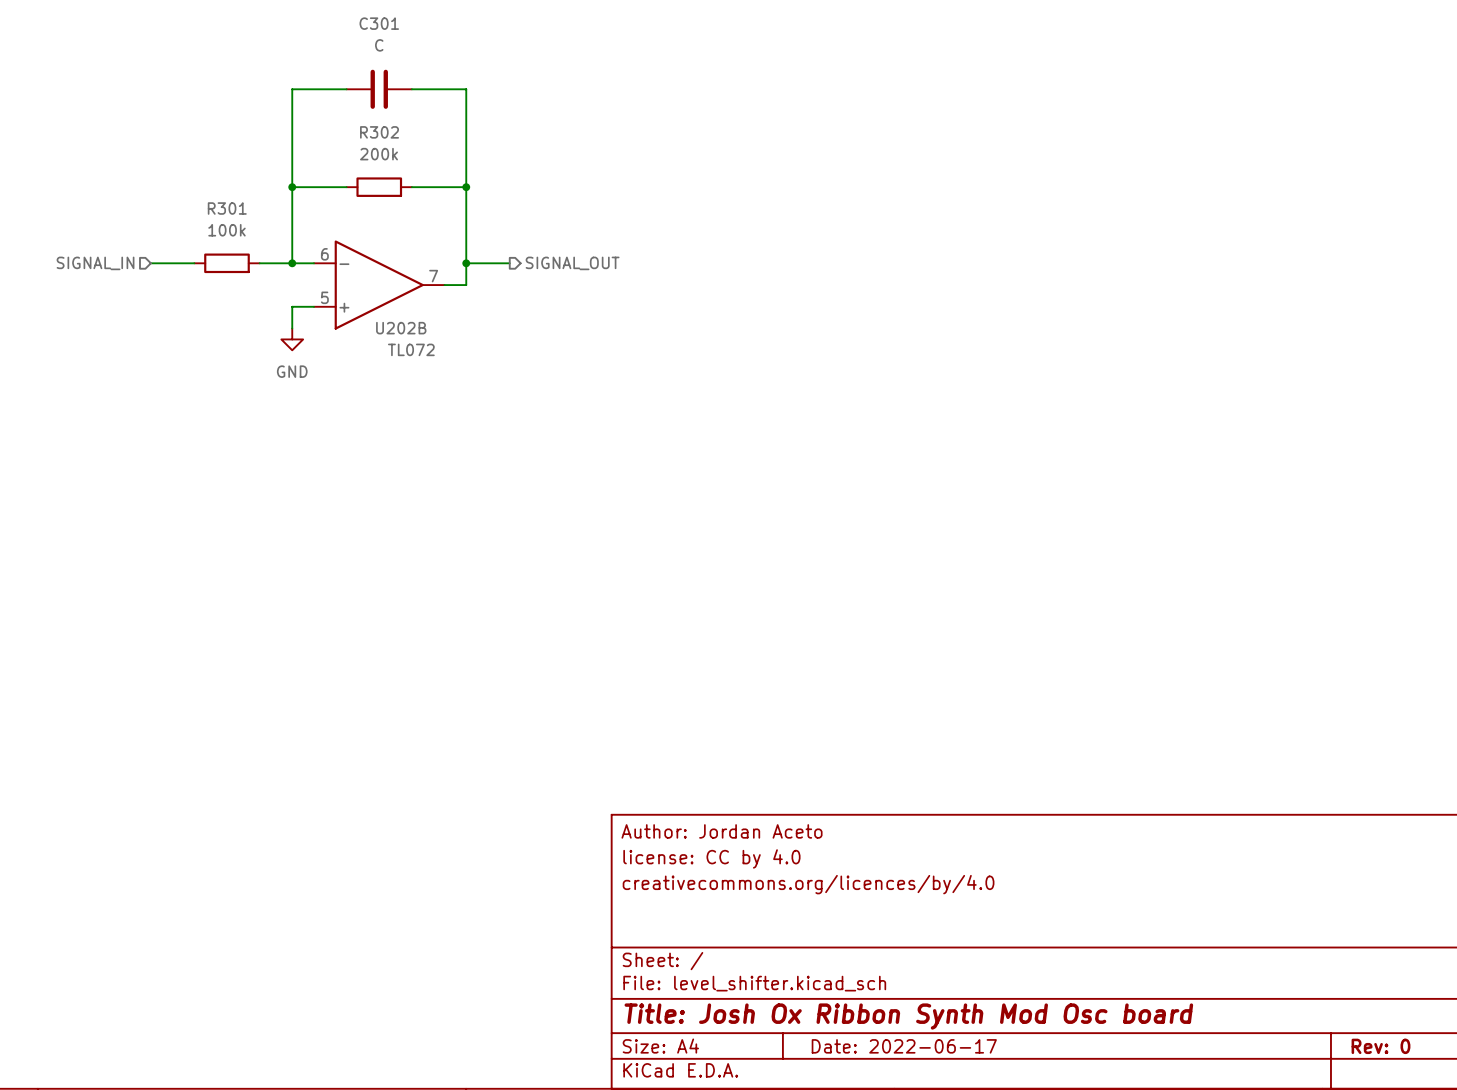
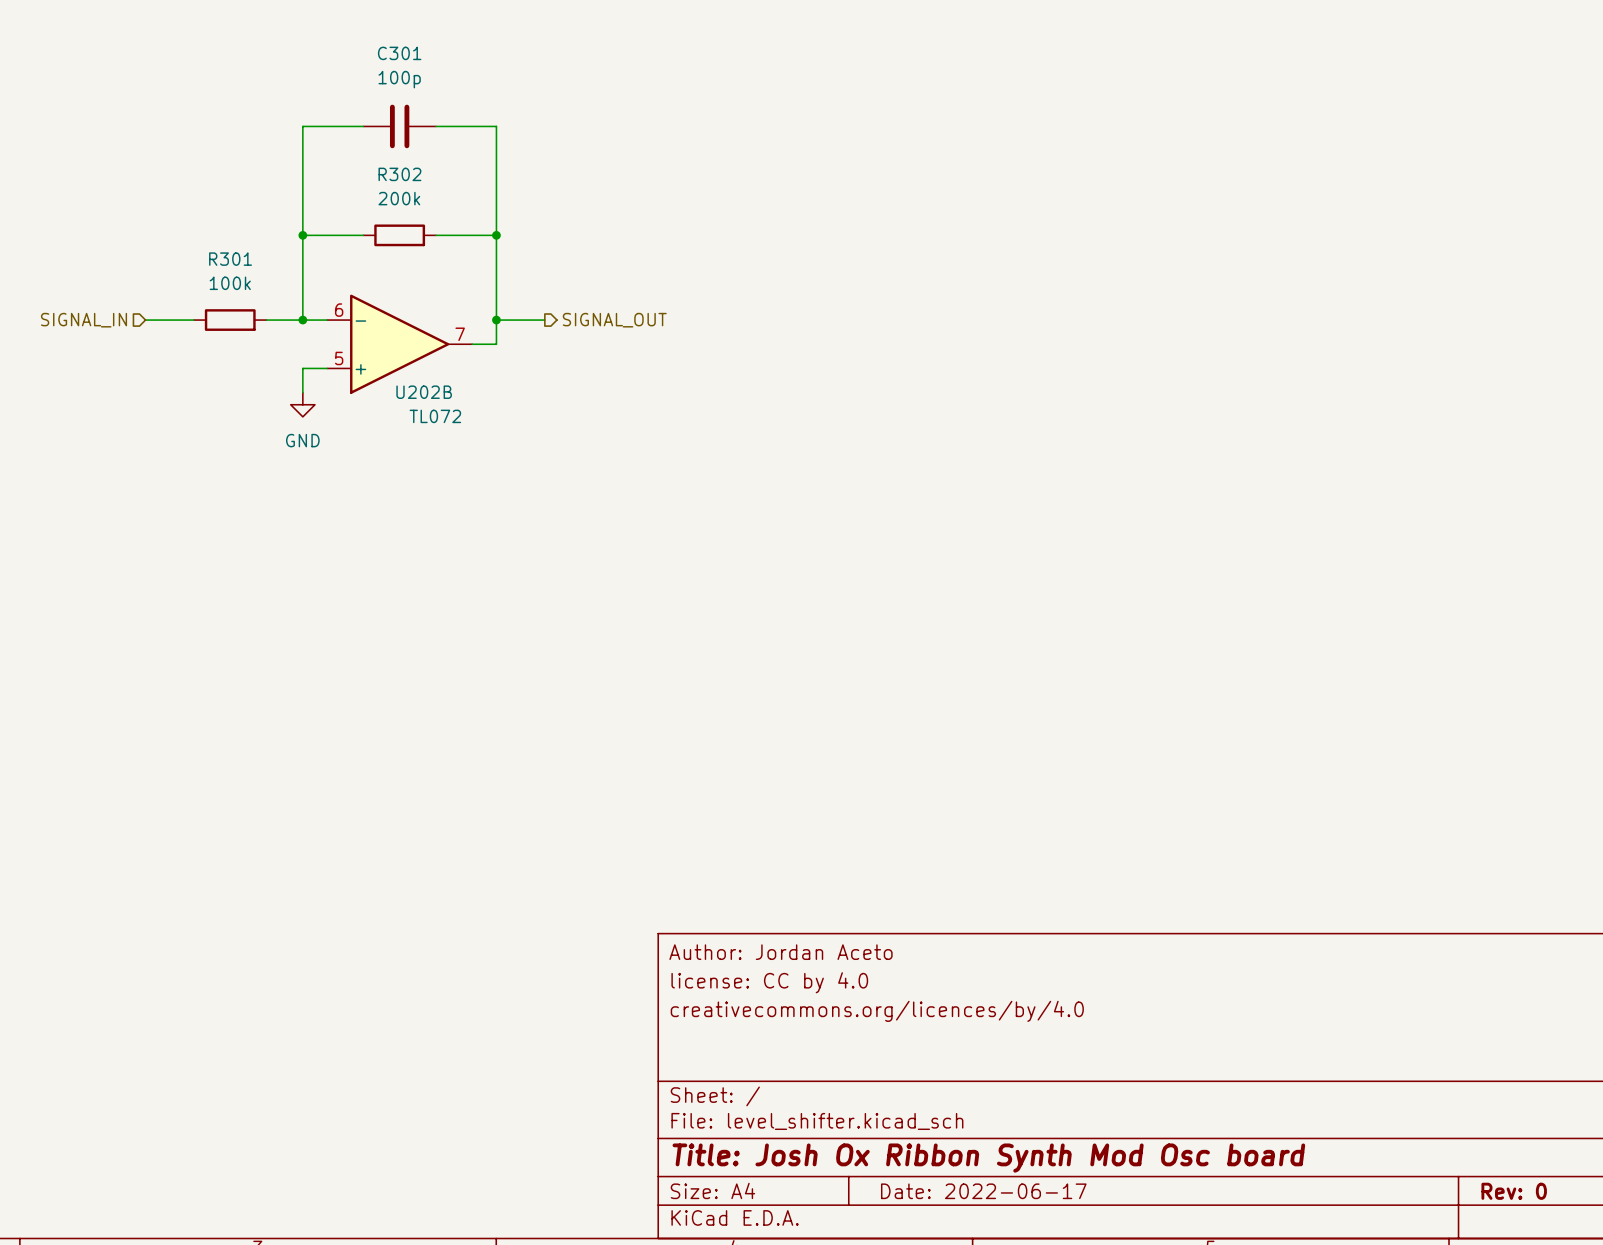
C301 value: C (379, 45) -> 100p (399, 79)

